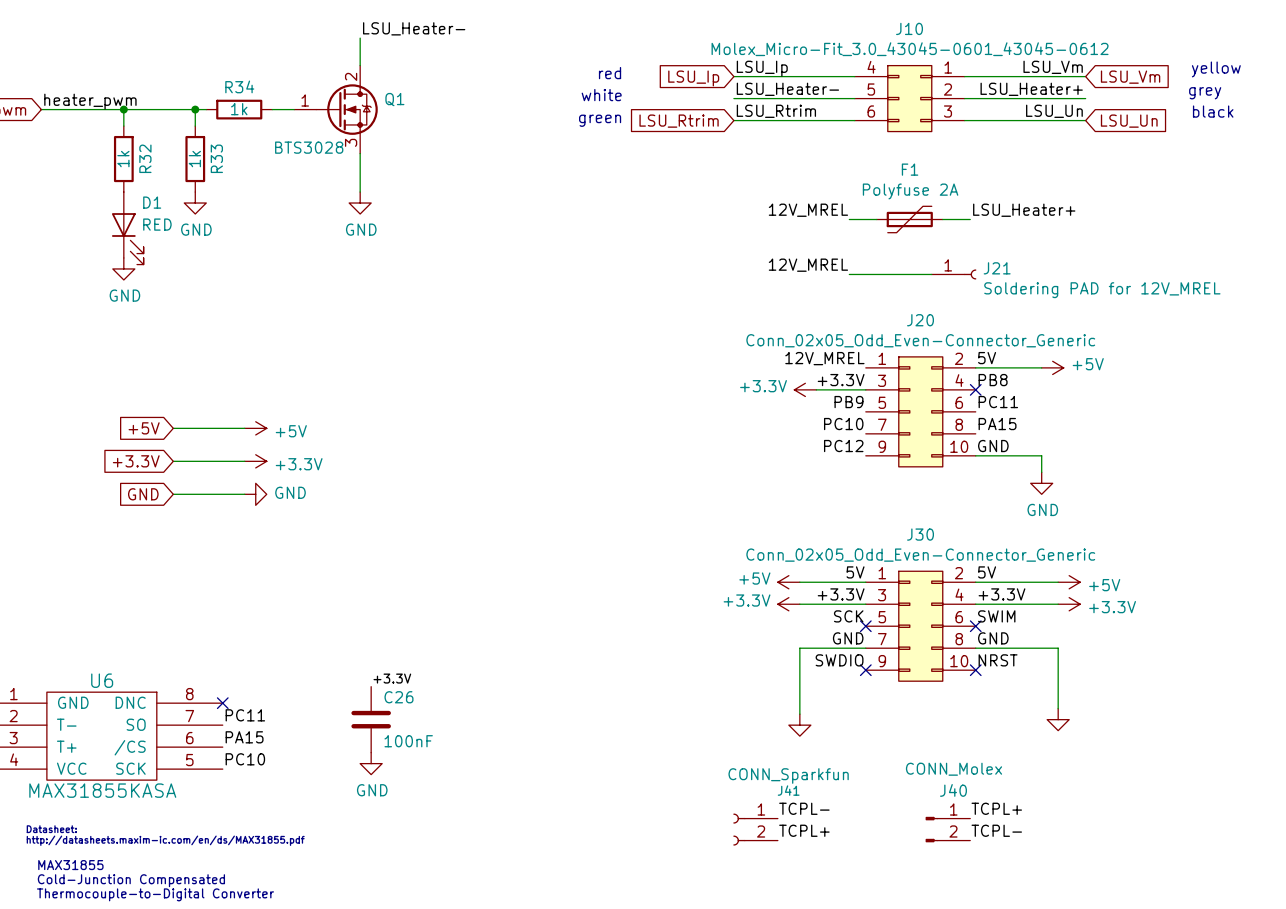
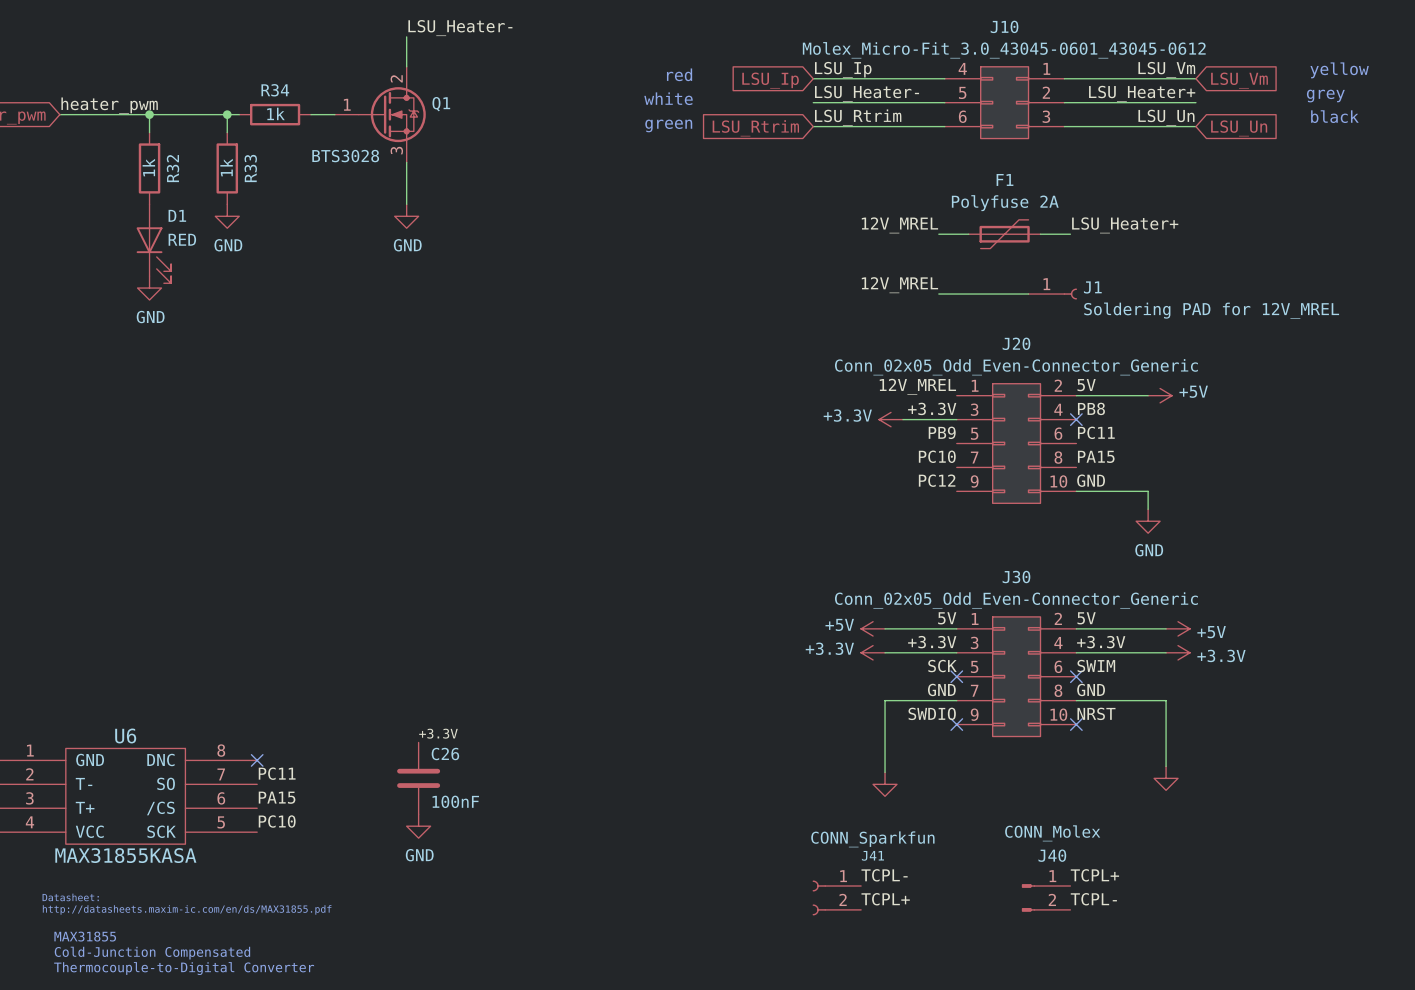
J21 name: J21 (997, 268) -> J1 (1092, 287)
global label: +5V (144, 428) -> none
wire: (173, 428) (244, 428) -> none
power symbol: +5V (255, 428) -> none
global label: +3.3V (136, 461) -> none
wire: (173, 461) (244, 461) -> none
power symbol: +3.3V (255, 461) -> none
global label: GND (143, 494) -> none
wire: (173, 494) (244, 494) -> none
power symbol: GND (255, 494) -> none

